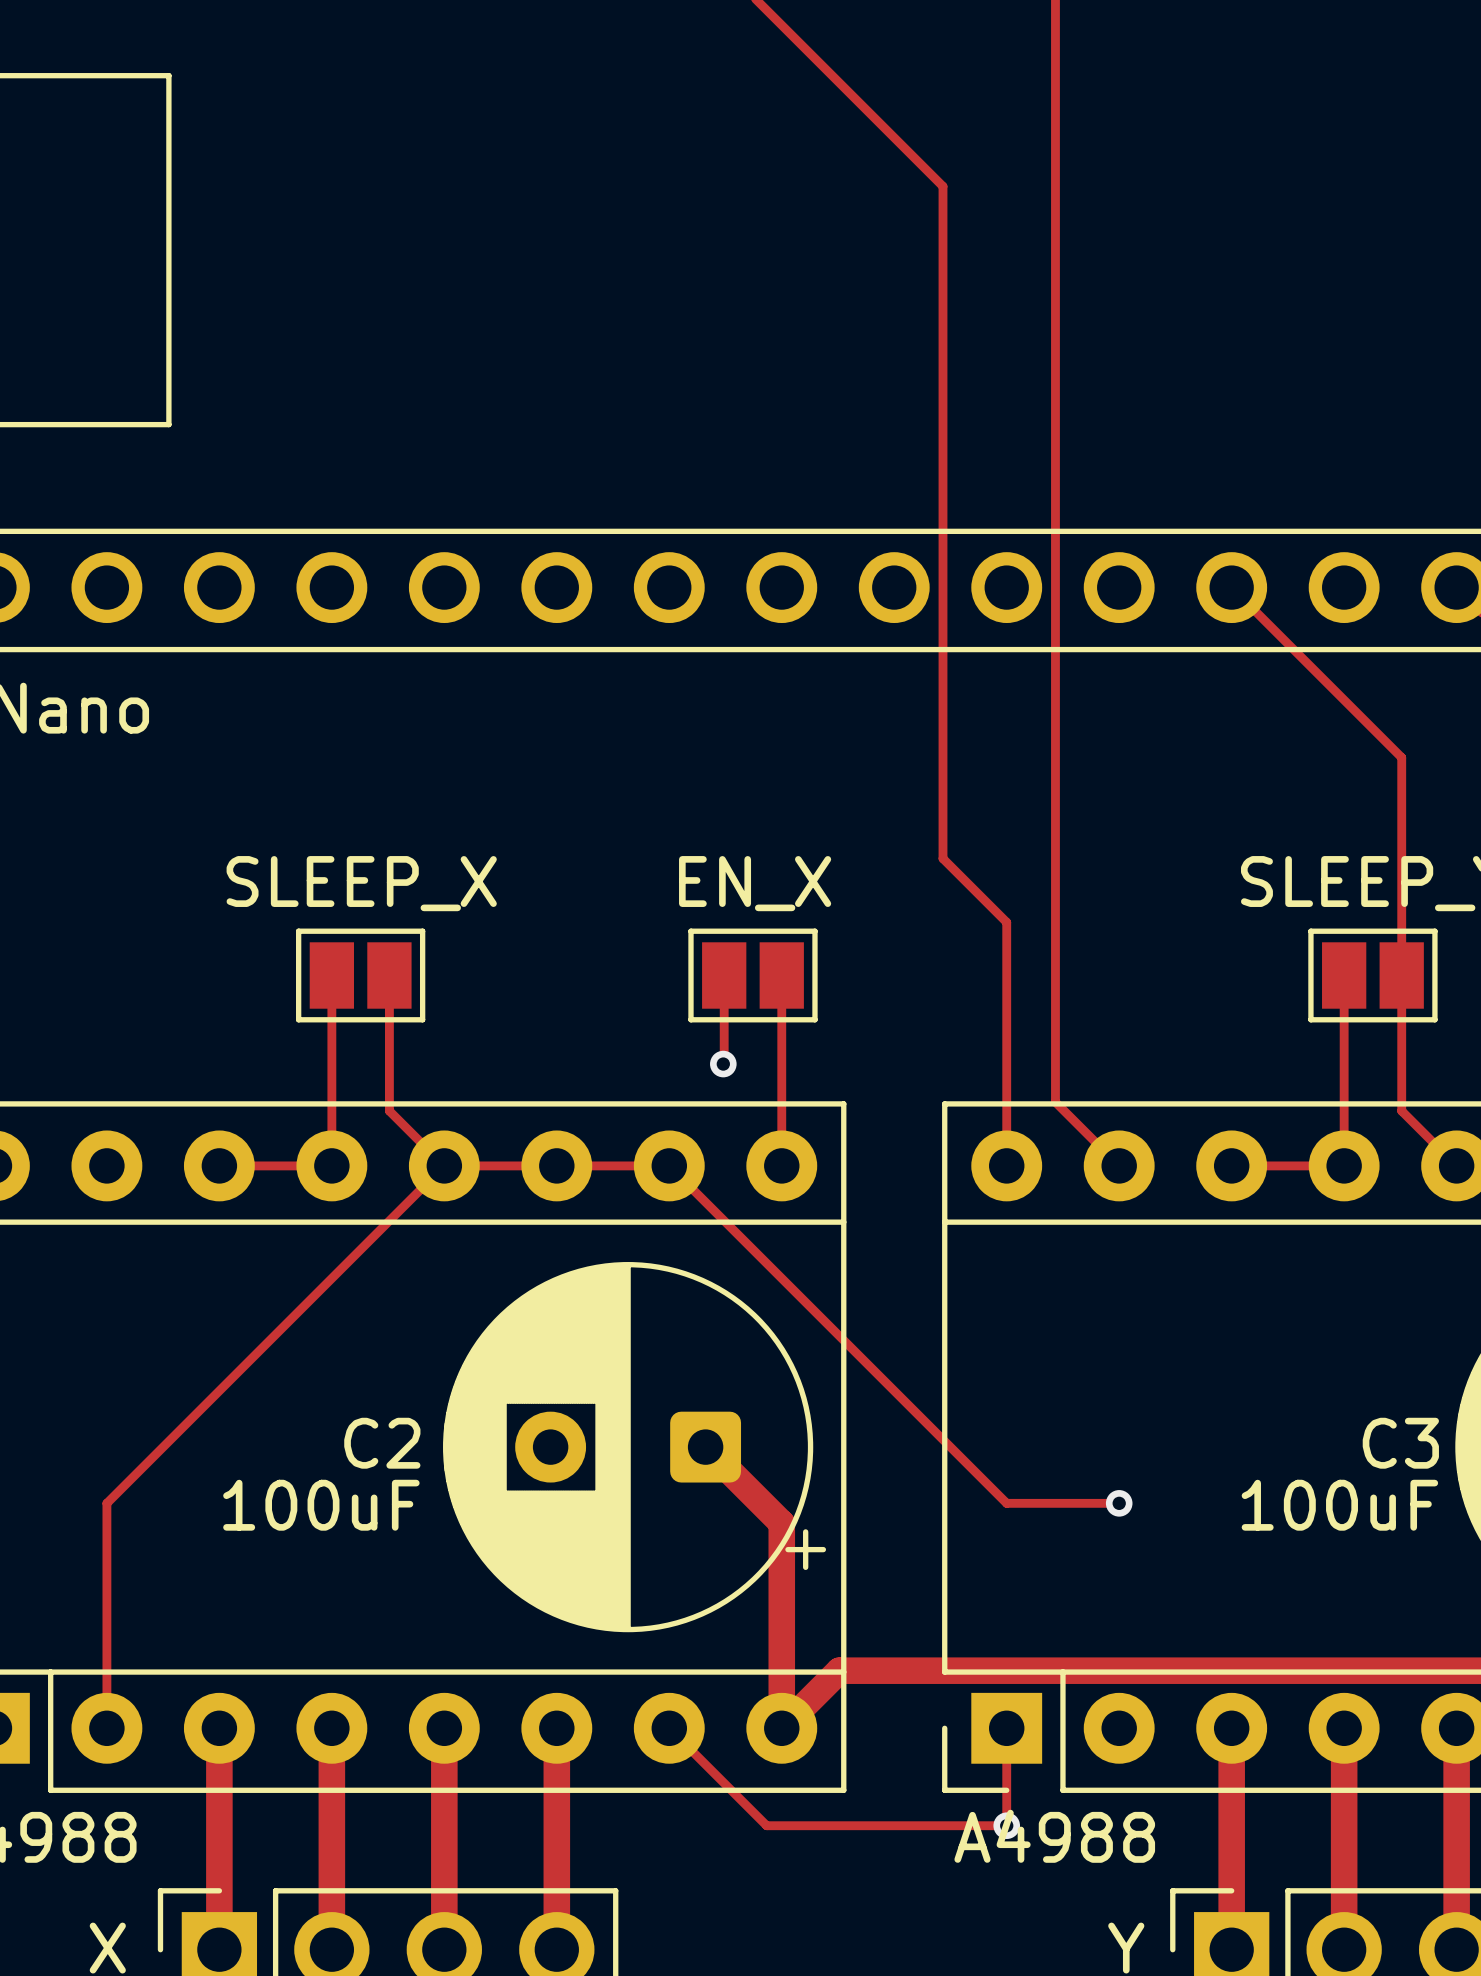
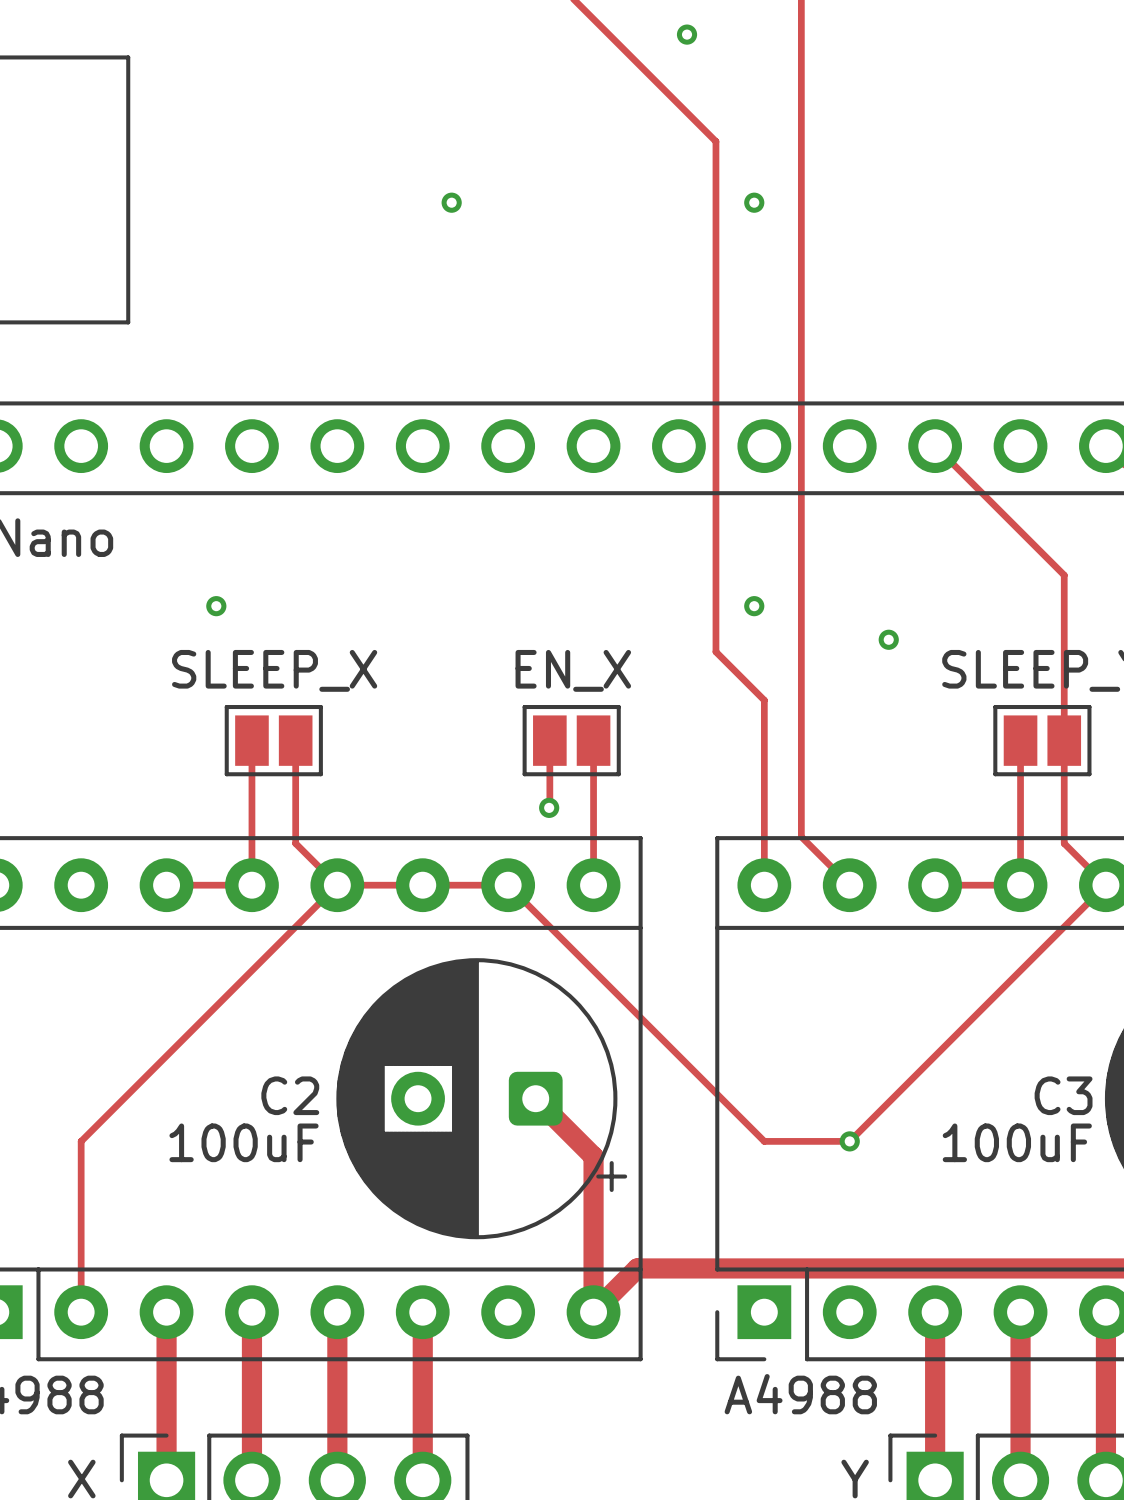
via: none -> (687, 34)
via: none -> (451, 202)
via: none -> (754, 202)
via: none -> (216, 606)
via: none -> (754, 606)
via: none -> (888, 639)
track: none -> (1105, 885) (849, 1141)
track: (669, 1728) (766, 1825) (1006, 1825) (1006, 1728) -> none
via: (1006, 1825) -> none

